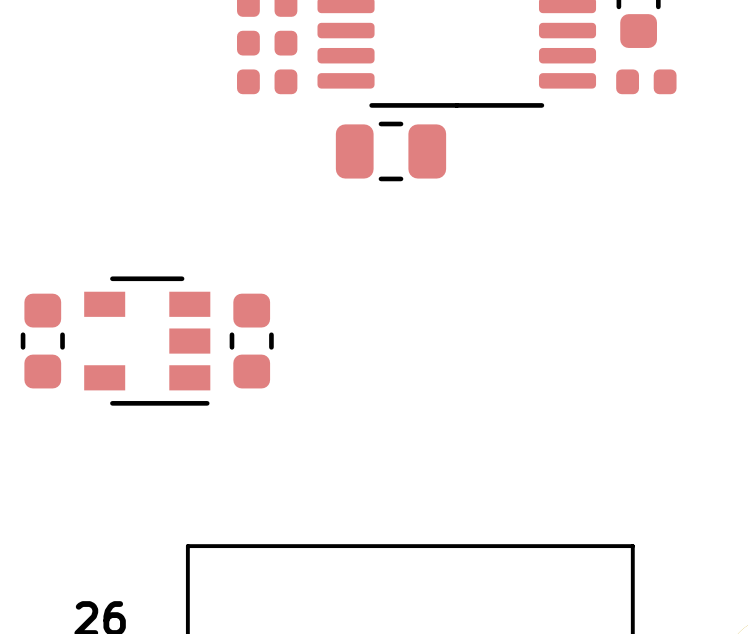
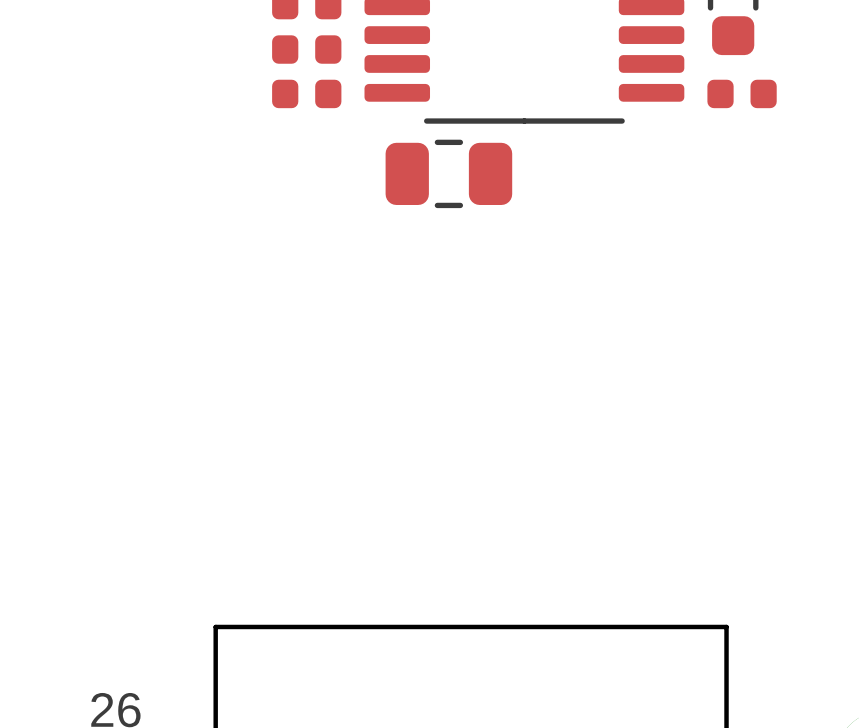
part: (42, 341) -> none
part: (147, 341) -> none
part: (251, 341) -> none

